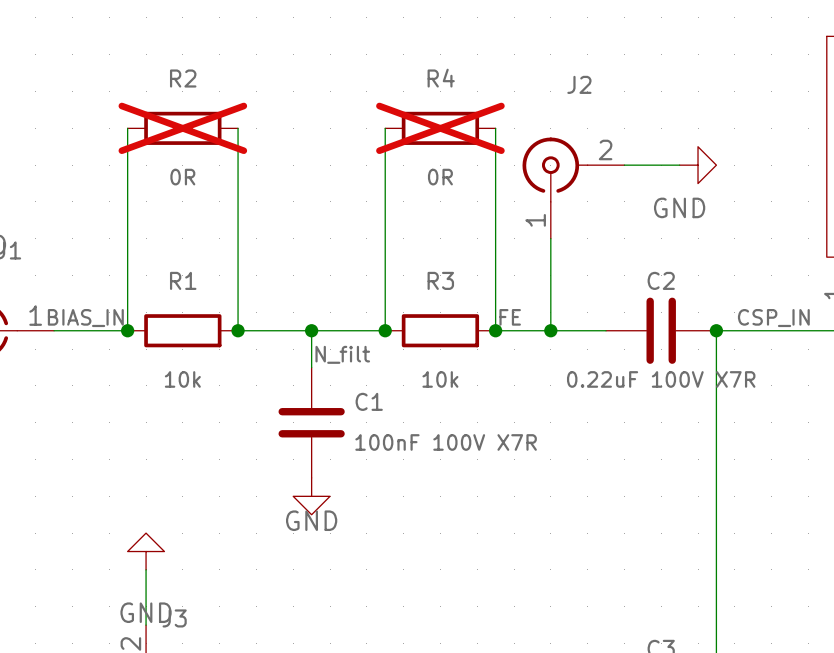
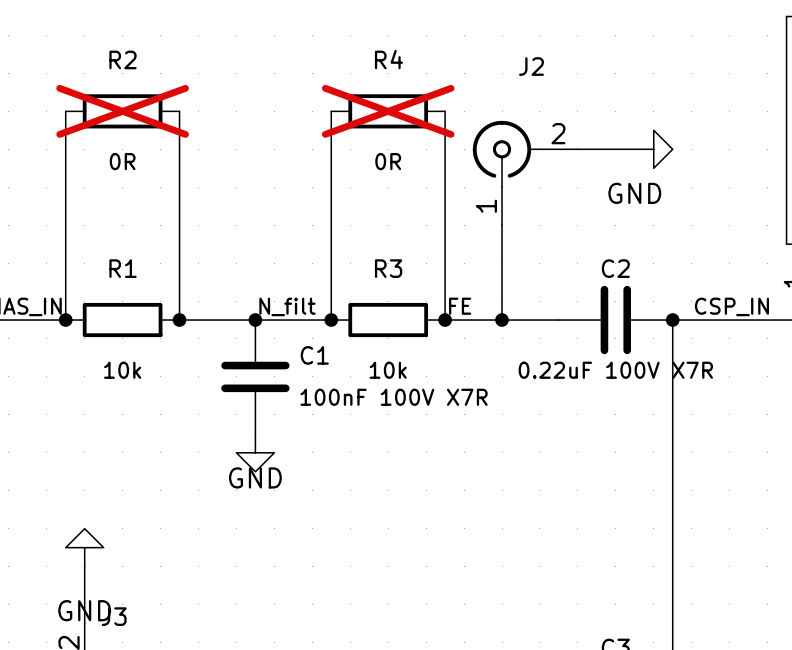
label position: N_filt (342, 354) -> N_filt (287, 306)
C1 position: (311, 422) -> (255, 376)
power symbol position: GND (311, 496) -> GND (255, 452)

